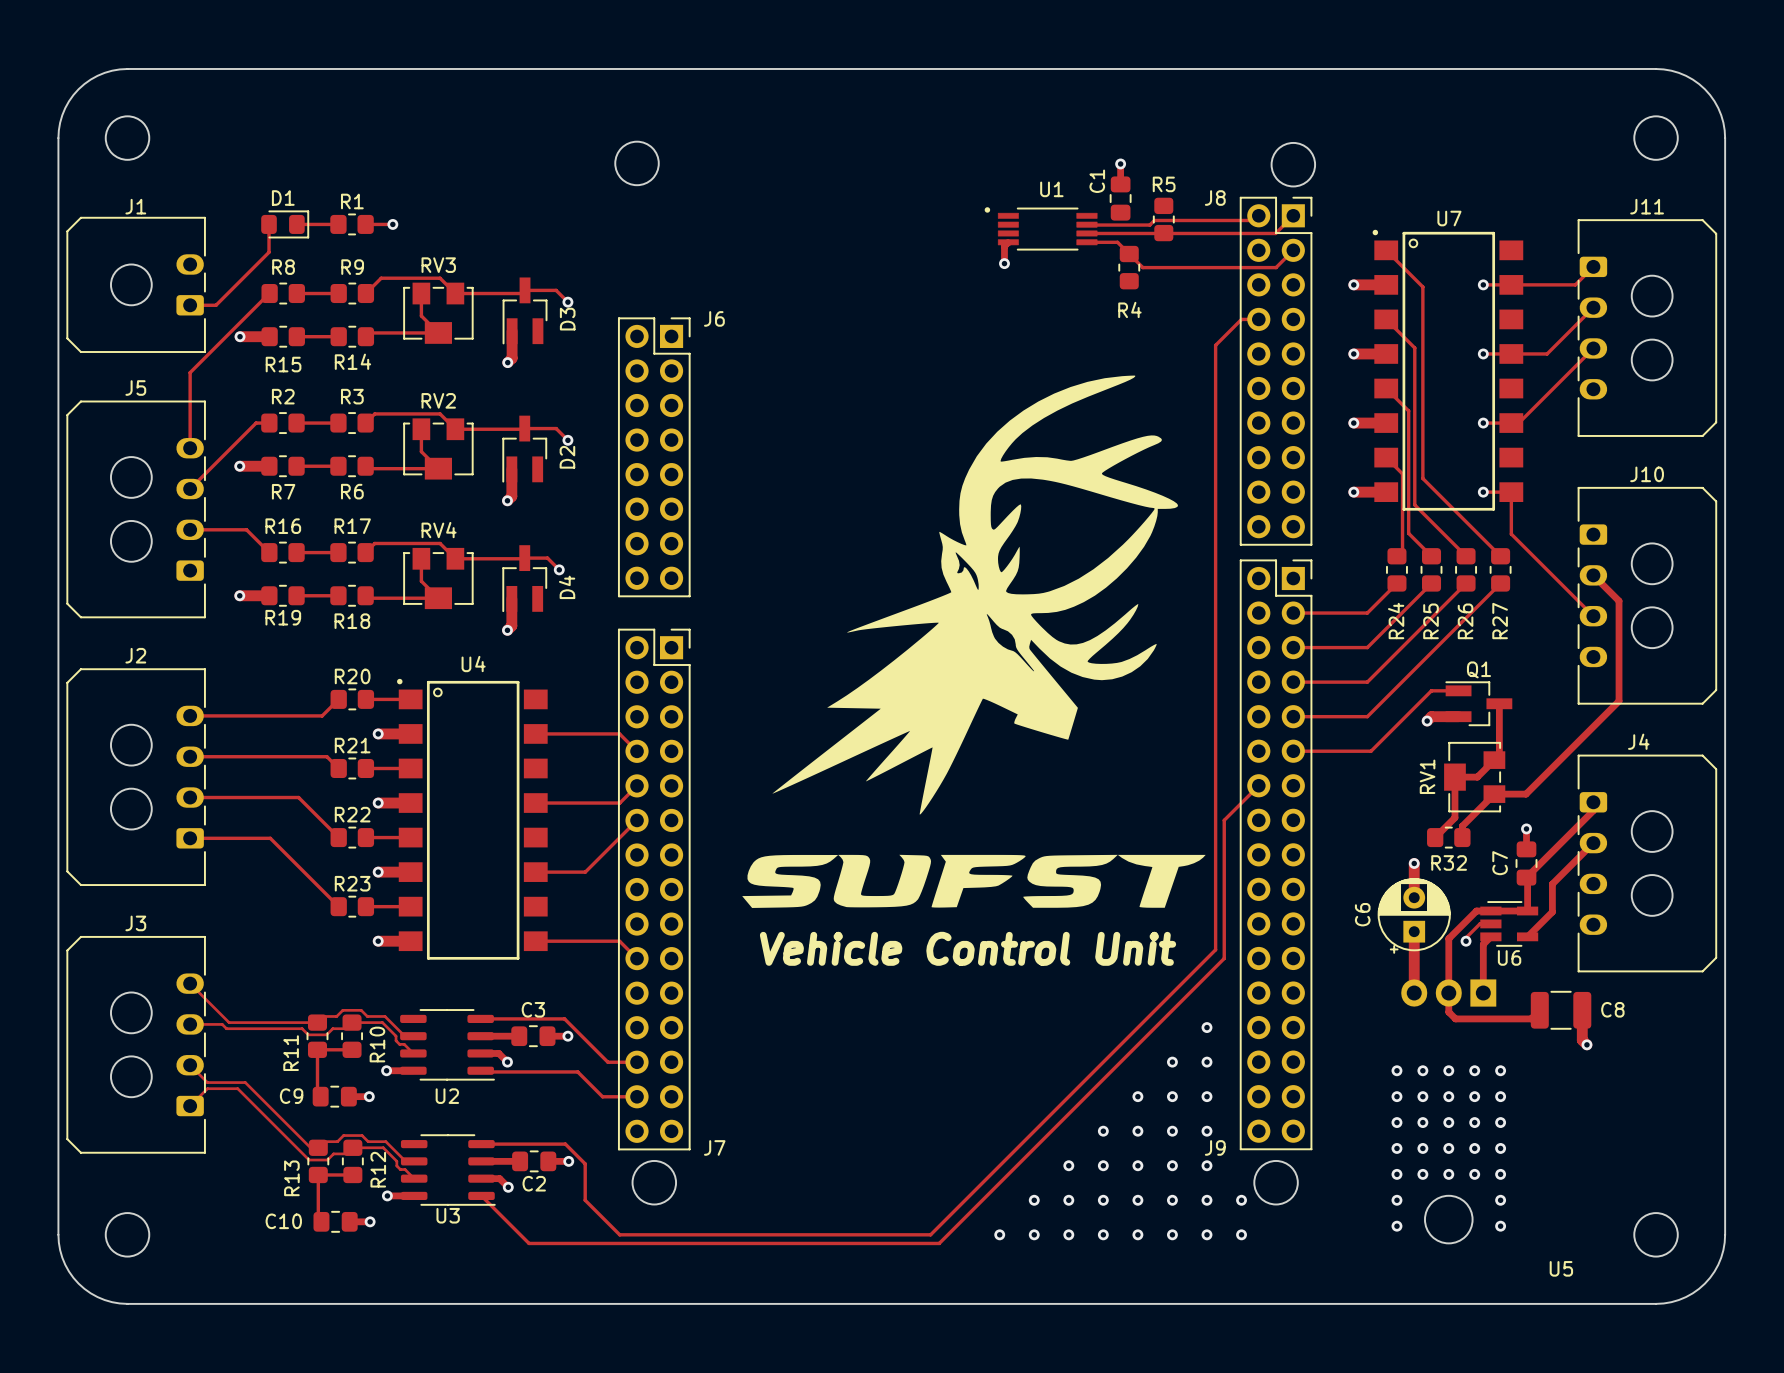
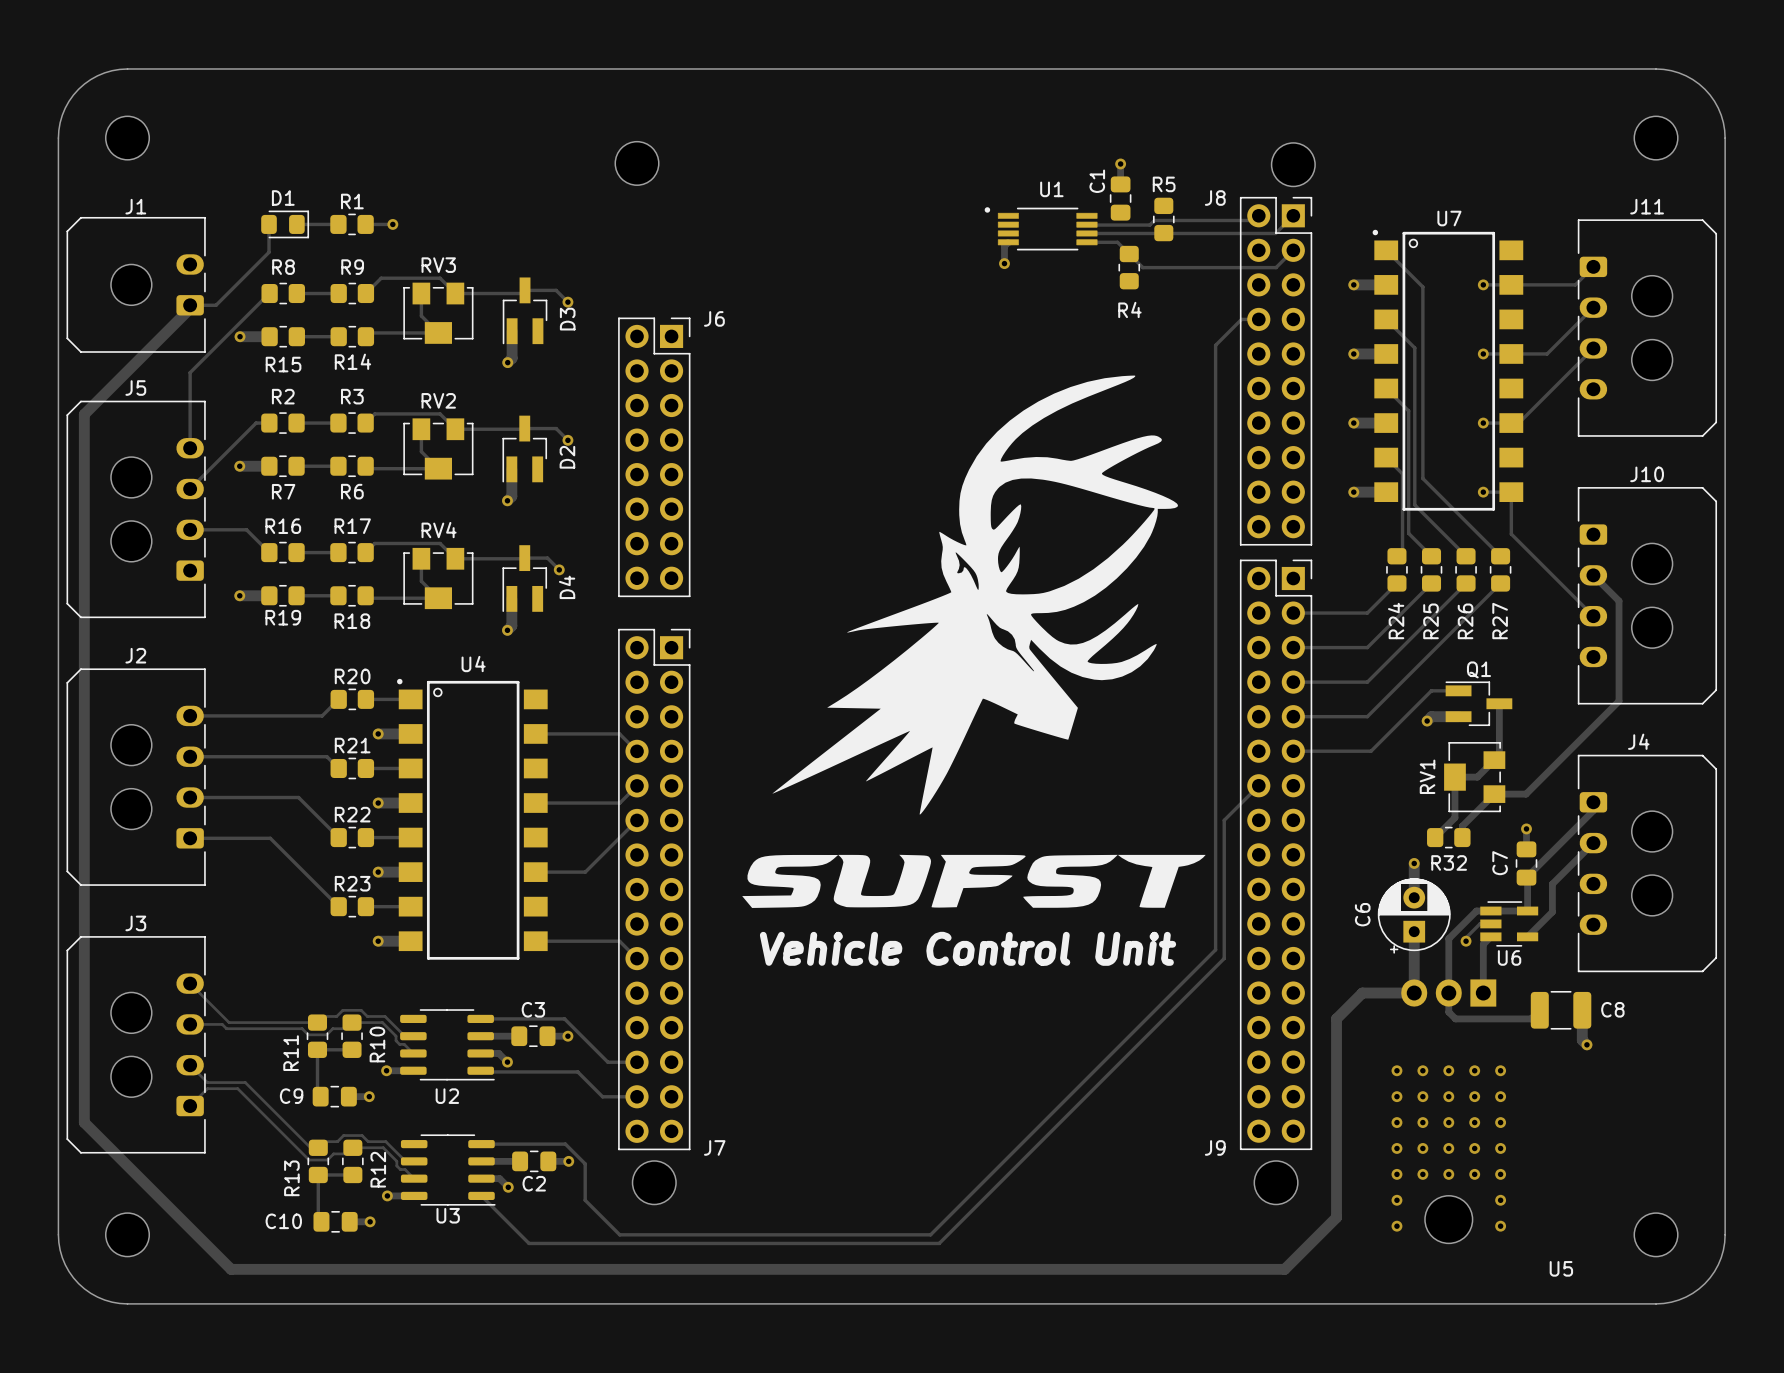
track: none -> (190, 305) (190, 308) (84, 414) (84, 1122) (231, 1269) (1284, 1269) (1336, 1217) (1336, 1018) (1362, 993) (1414, 993)
via: (1206, 1027) -> none
via: (1172, 1062) -> none
via: (1206, 1062) -> none
via: (1137, 1096) -> none
via: (1172, 1096) -> none
via: (1206, 1096) -> none
via: (1103, 1131) -> none
via: (1137, 1131) -> none
via: (1172, 1131) -> none
via: (1206, 1131) -> none
via: (1068, 1165) -> none
via: (1103, 1165) -> none
via: (1137, 1165) -> none
via: (1172, 1165) -> none
via: (1206, 1165) -> none
via: (1034, 1200) -> none
via: (1068, 1200) -> none
via: (1103, 1200) -> none
via: (1137, 1200) -> none
via: (1172, 1200) -> none
via: (1206, 1200) -> none
via: (1241, 1200) -> none
via: (999, 1234) -> none
via: (1034, 1234) -> none
via: (1068, 1234) -> none
via: (1103, 1234) -> none
via: (1137, 1234) -> none
via: (1172, 1234) -> none
via: (1206, 1234) -> none
via: (1241, 1234) -> none

